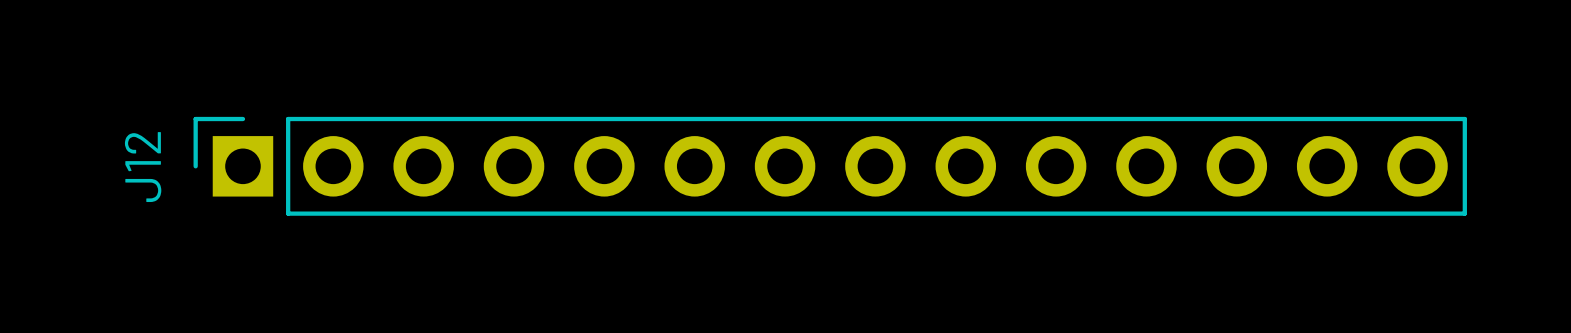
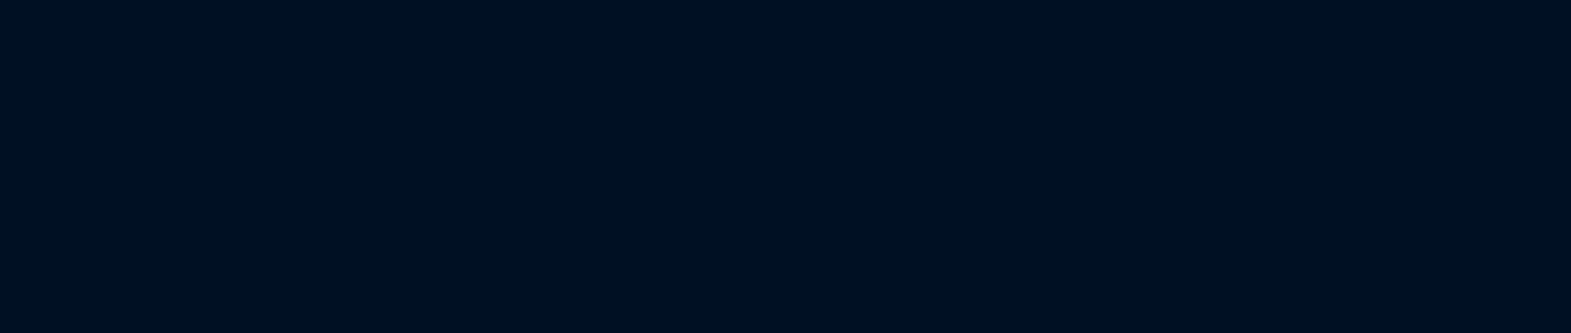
J12: (830, 166) -> none

